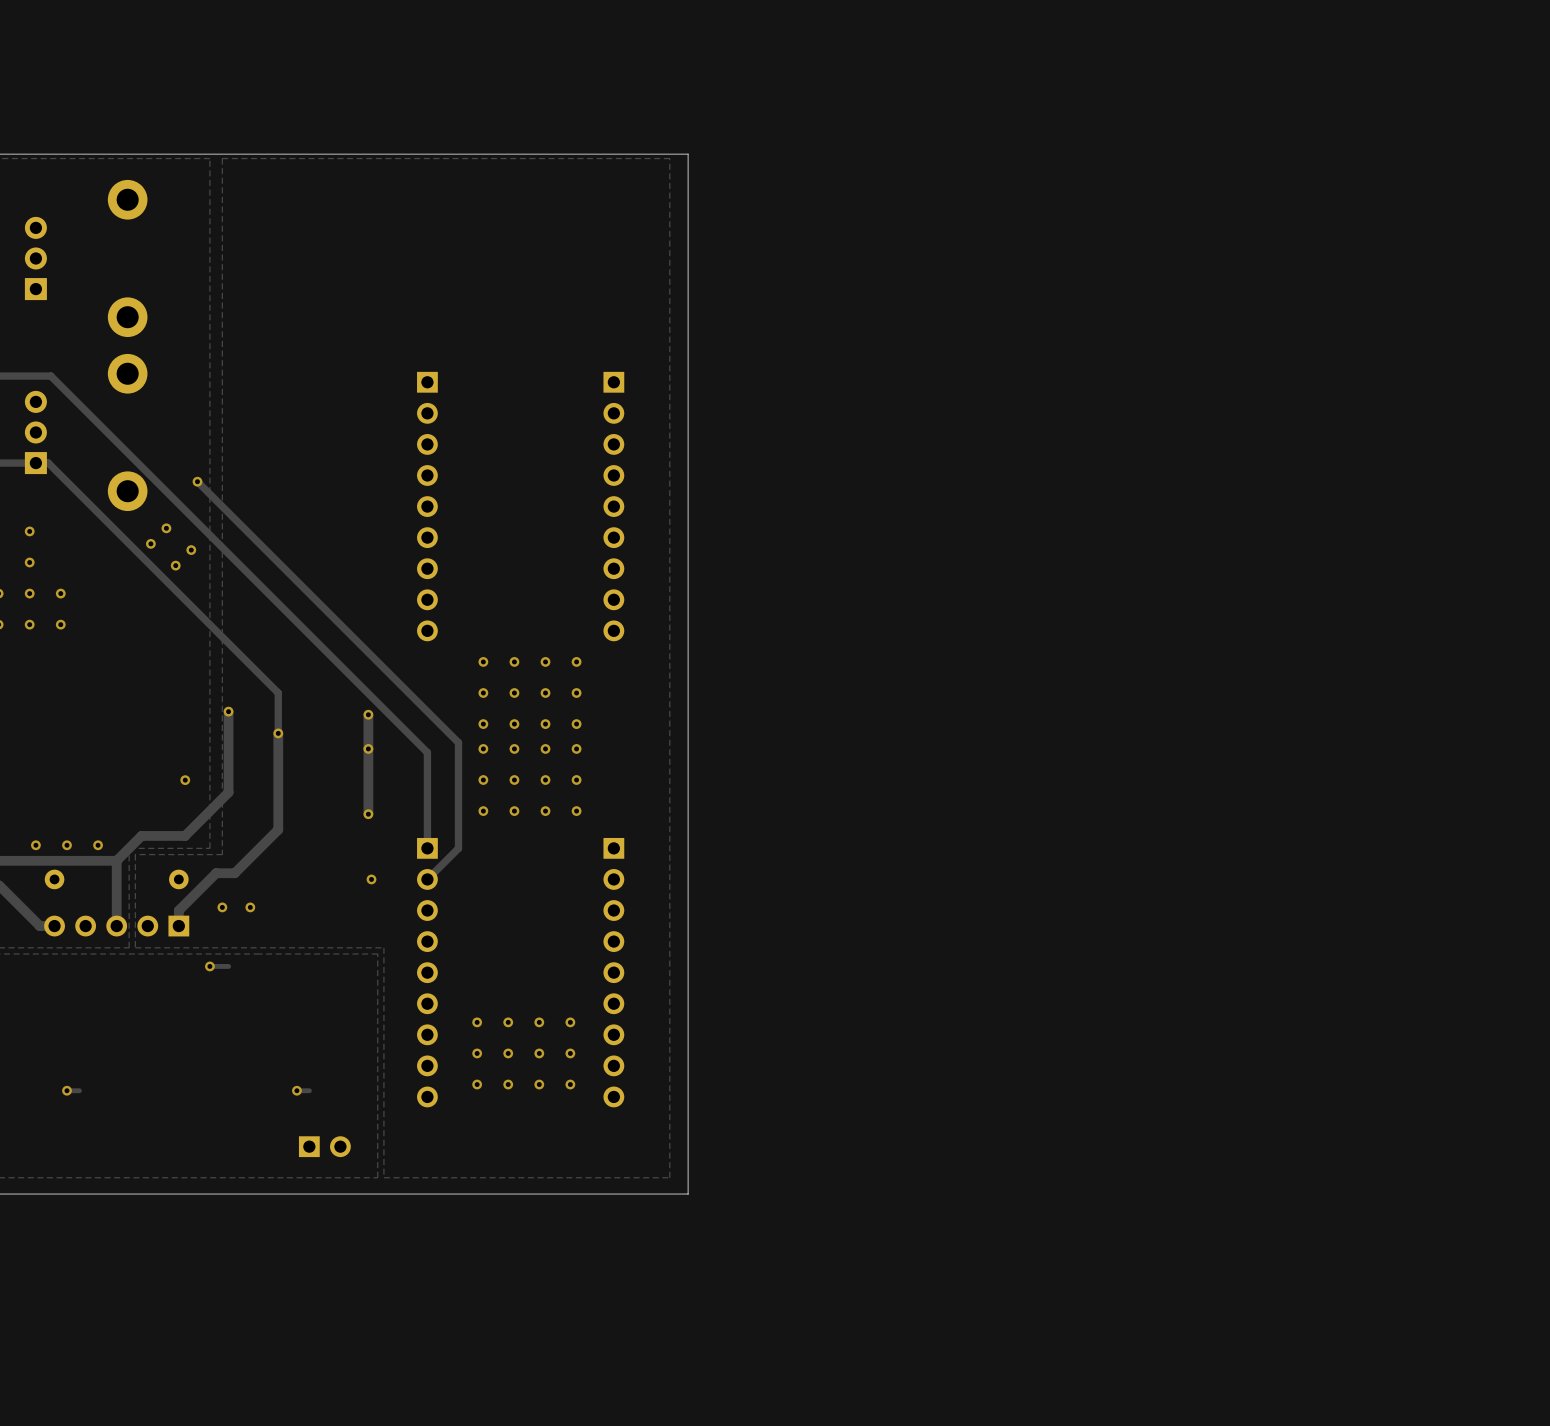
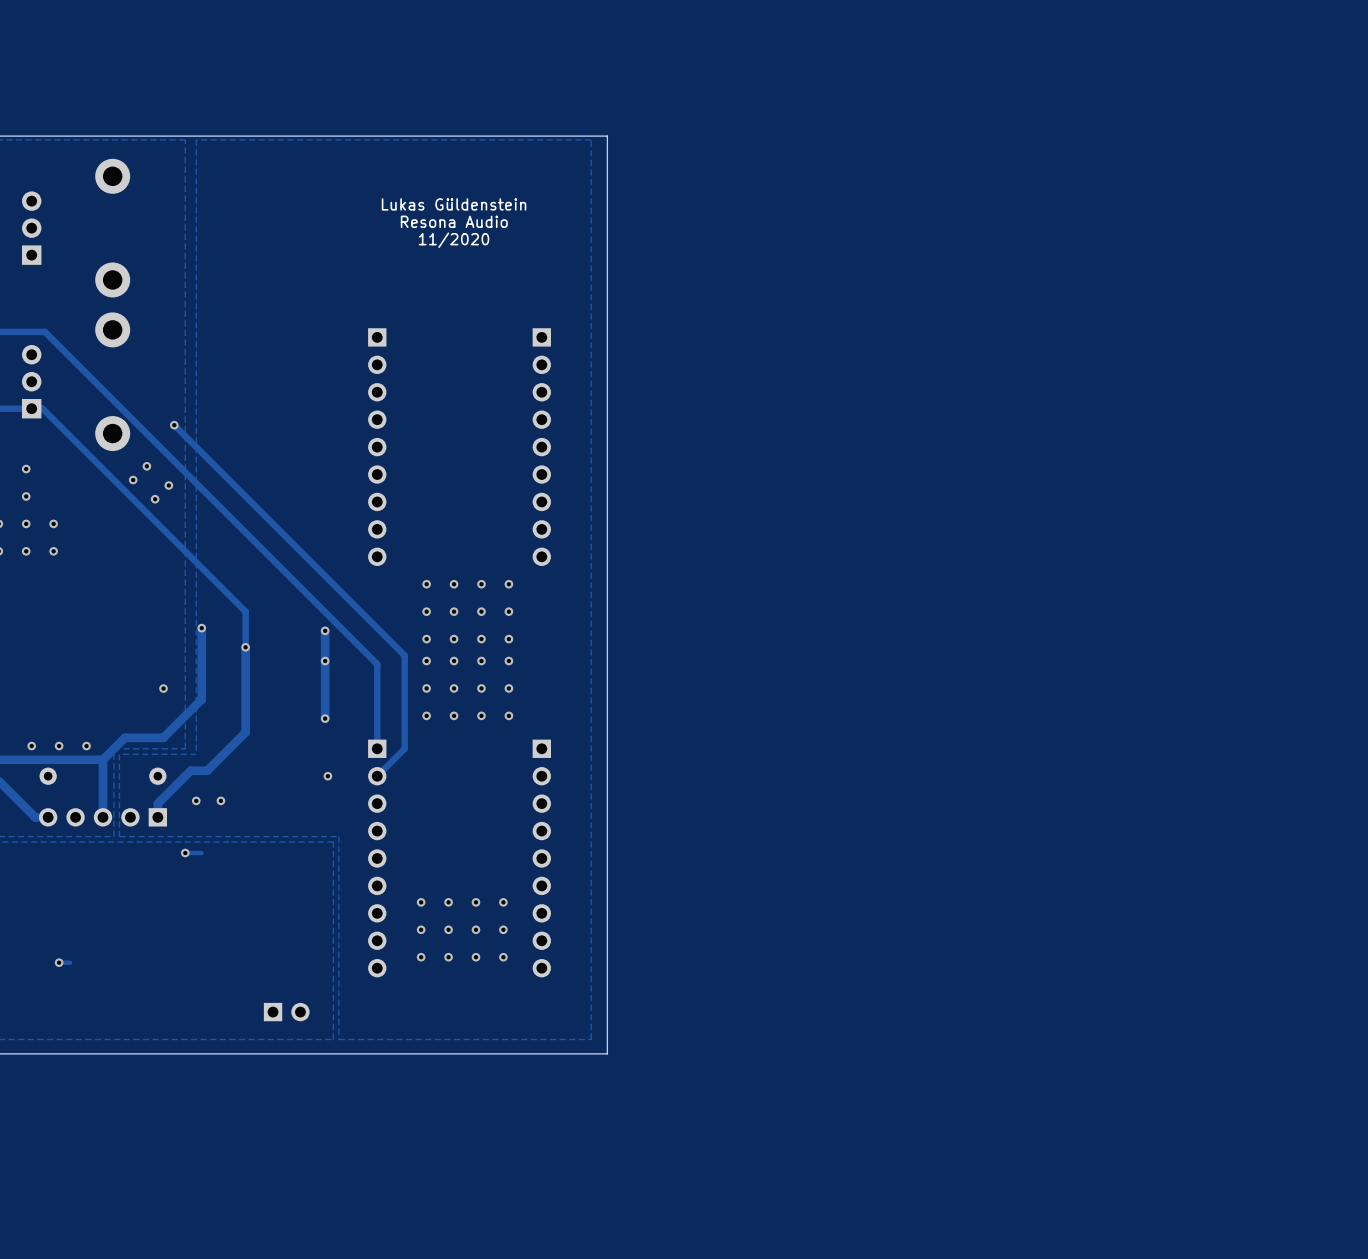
text: none -> Lukas Güldenstein (454, 204)
text: none -> Resona Audio (454, 221)
text: none -> 11/2020 (454, 240)
via: (296, 1090) -> none
track: (309, 1090) (296, 1090) -> none

